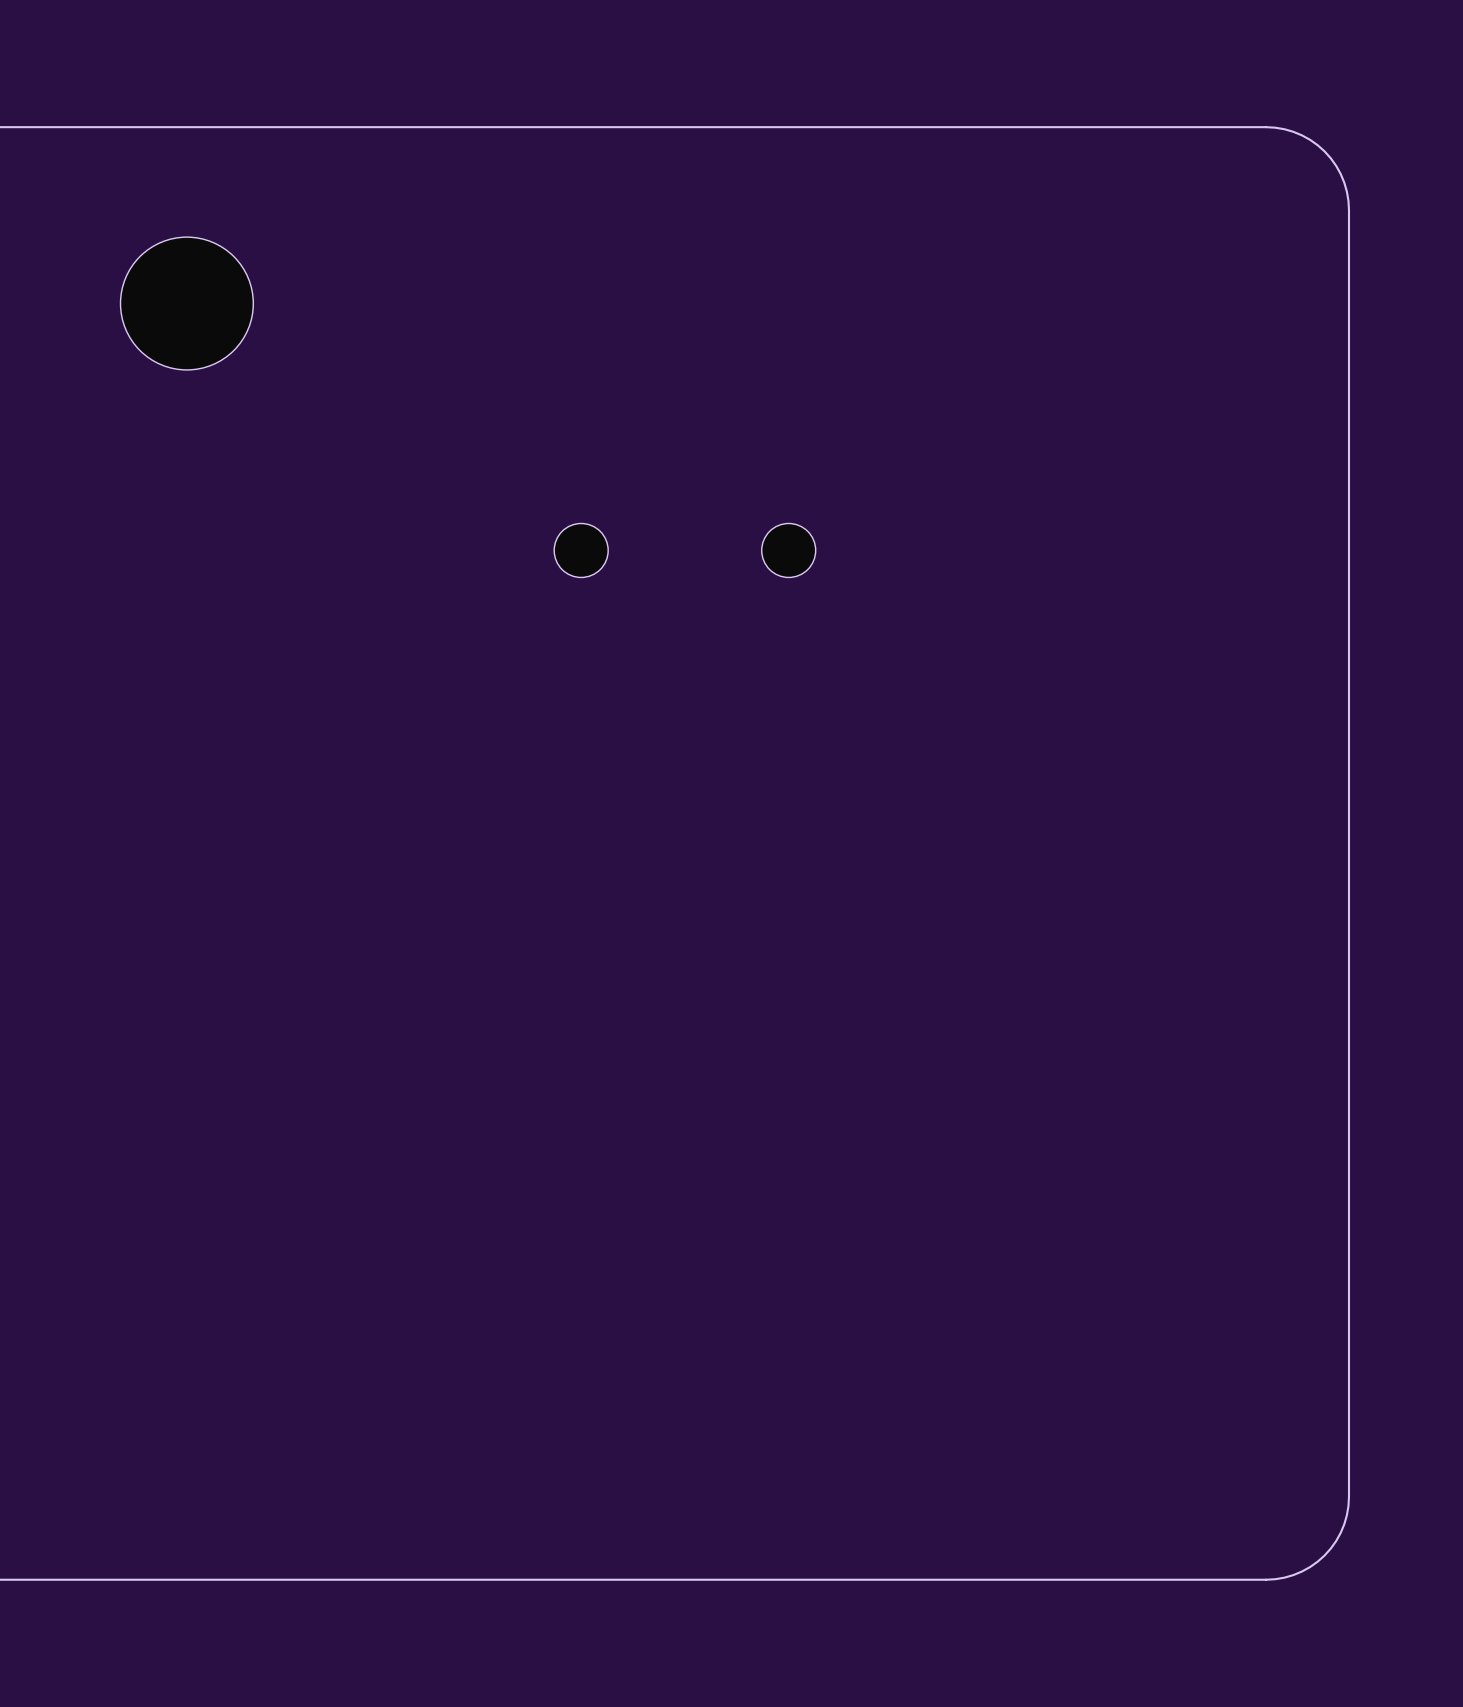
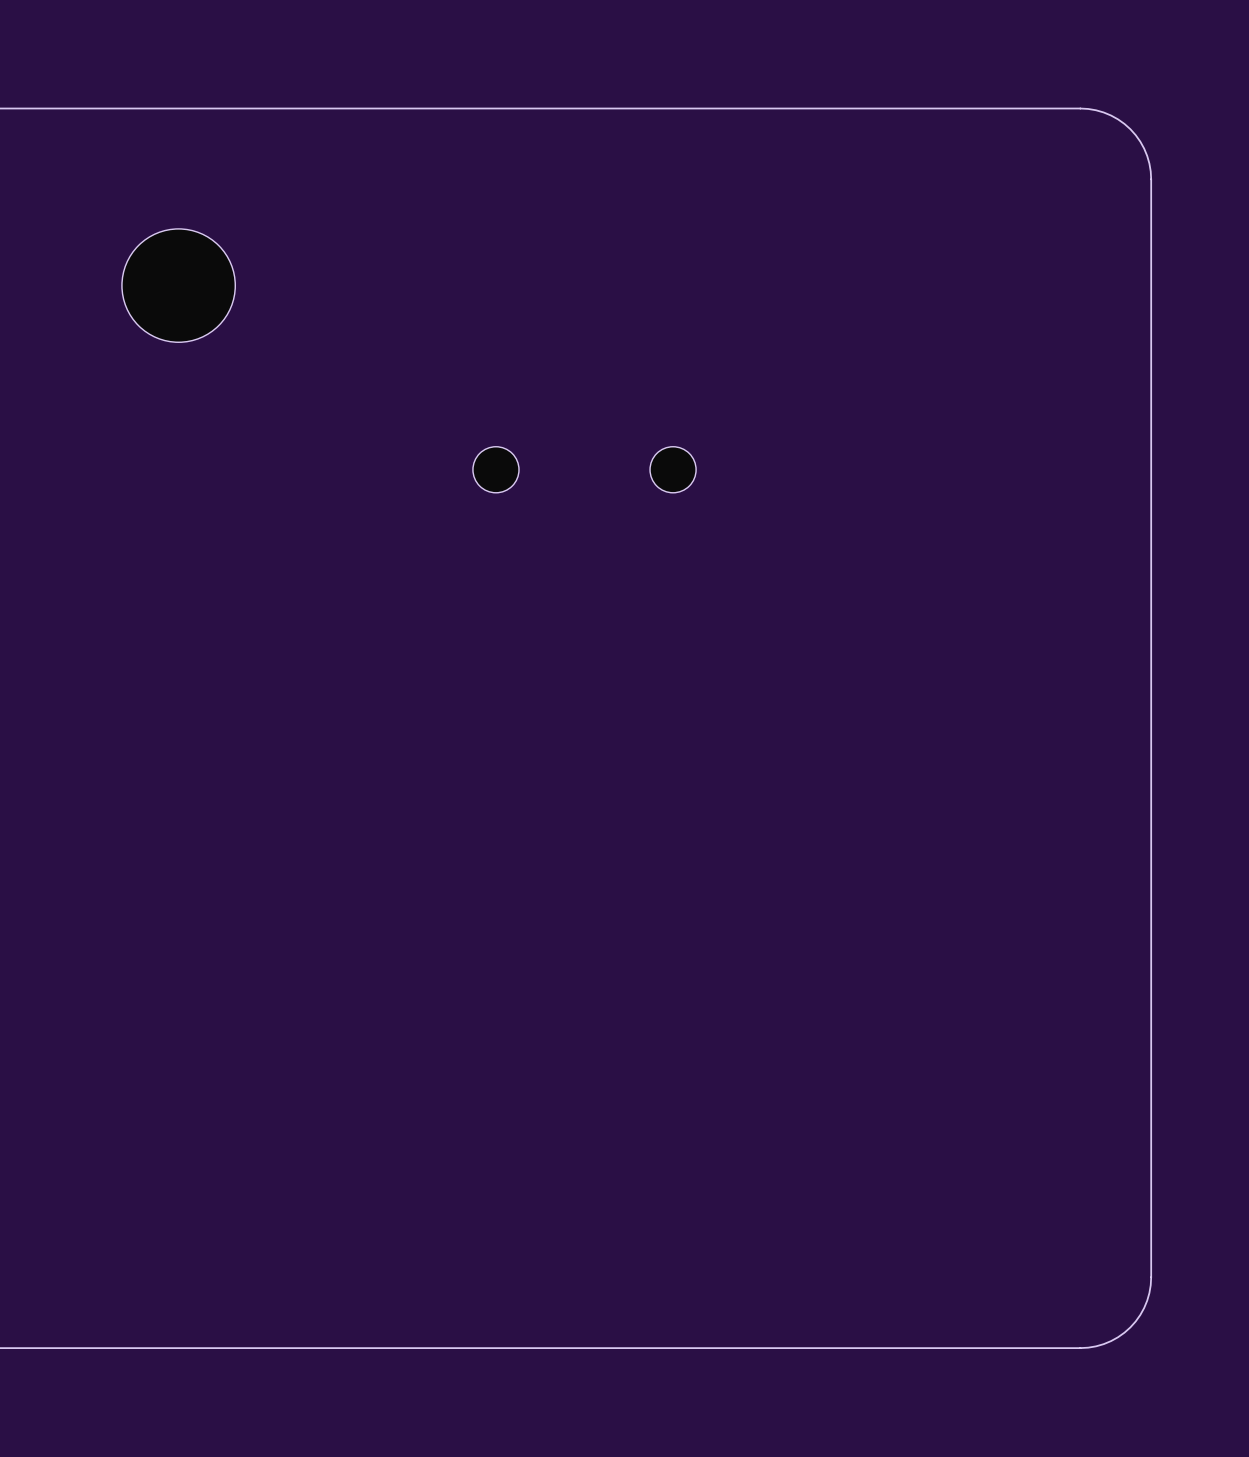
part position: (186, 303) -> (178, 285)

